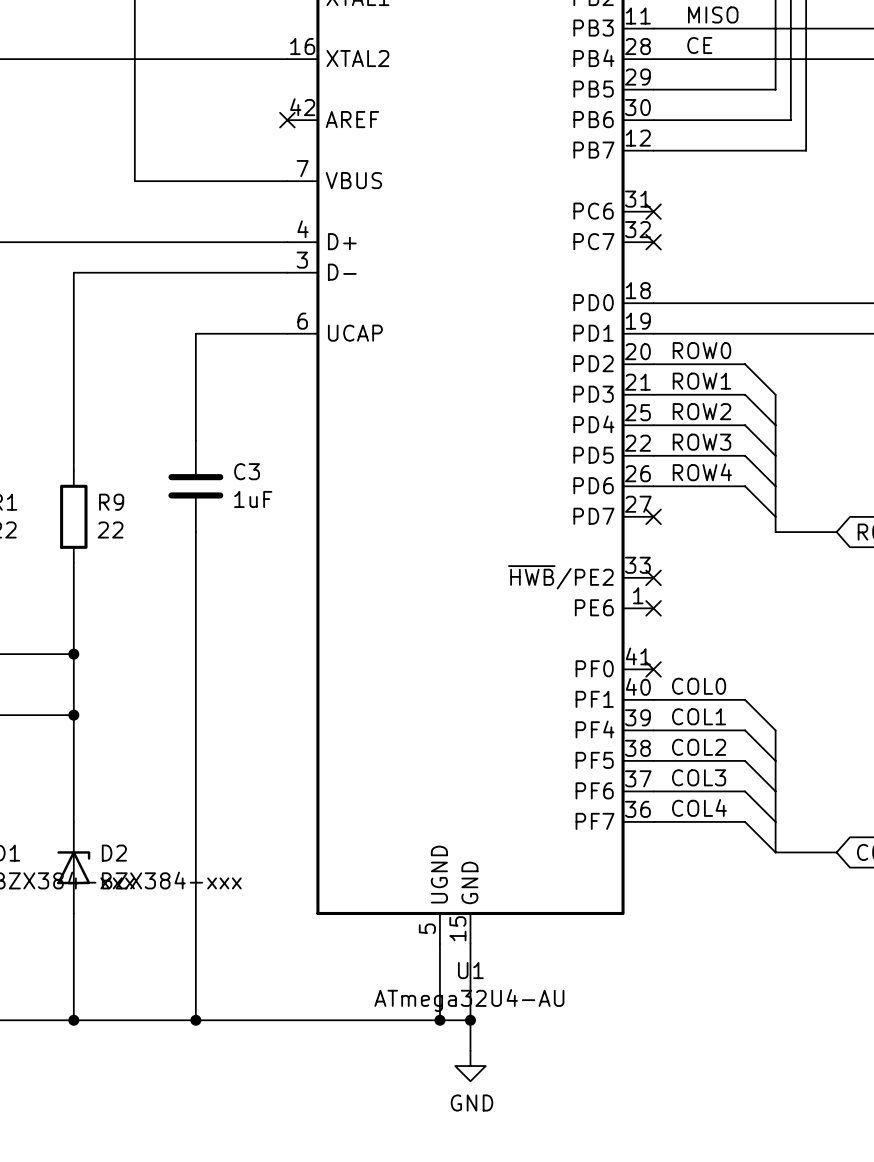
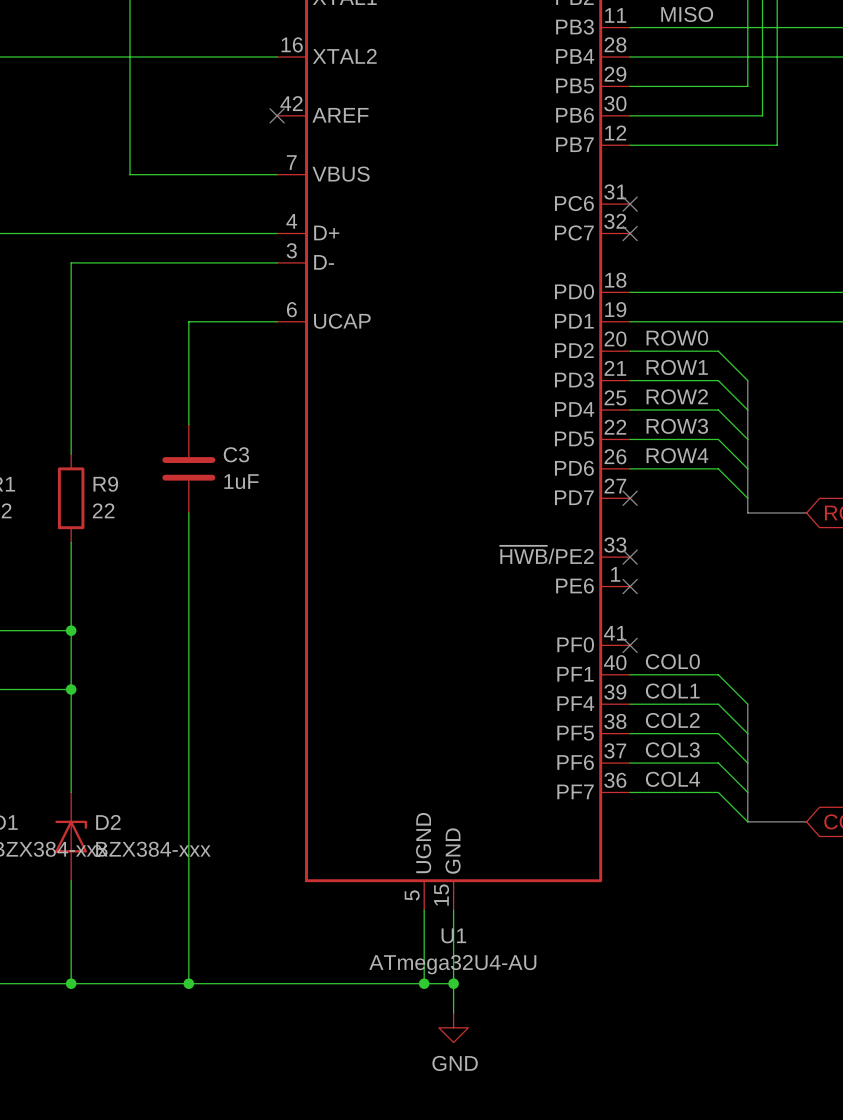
label: CE (699, 45) -> none

